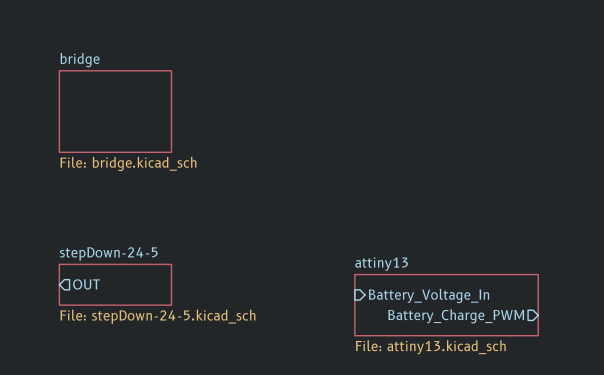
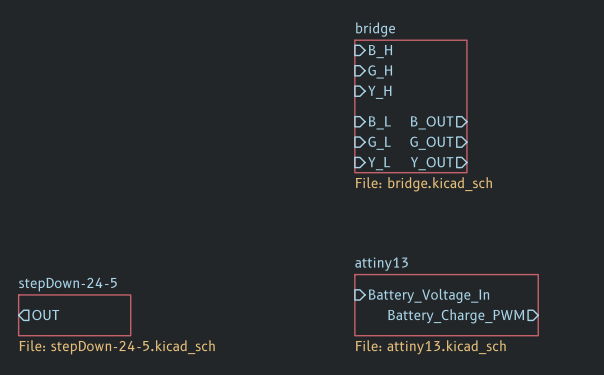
sheet pin: none -> B_H (380, 51)
sheet pin: none -> G_H (380, 71)
sheet pin: none -> Y_H (379, 92)
sheet bridge: none -> File: bridge.kicad_sch (410, 106)
sheet bridge: File: bridge.kicad_sch (115, 111) -> none
sheet pin: none -> B_L (379, 122)
sheet pin: none -> B_OUT (432, 122)
sheet pin: none -> G_L (379, 143)
sheet pin: none -> G_OUT (431, 143)
sheet pin: none -> Y_L (379, 163)
sheet pin: none -> Y_OUT (432, 163)
sheet pin position: OUT (86, 284) -> OUT (45, 315)
sheet stepDown-24-5 position: (115, 284) -> (74, 315)

